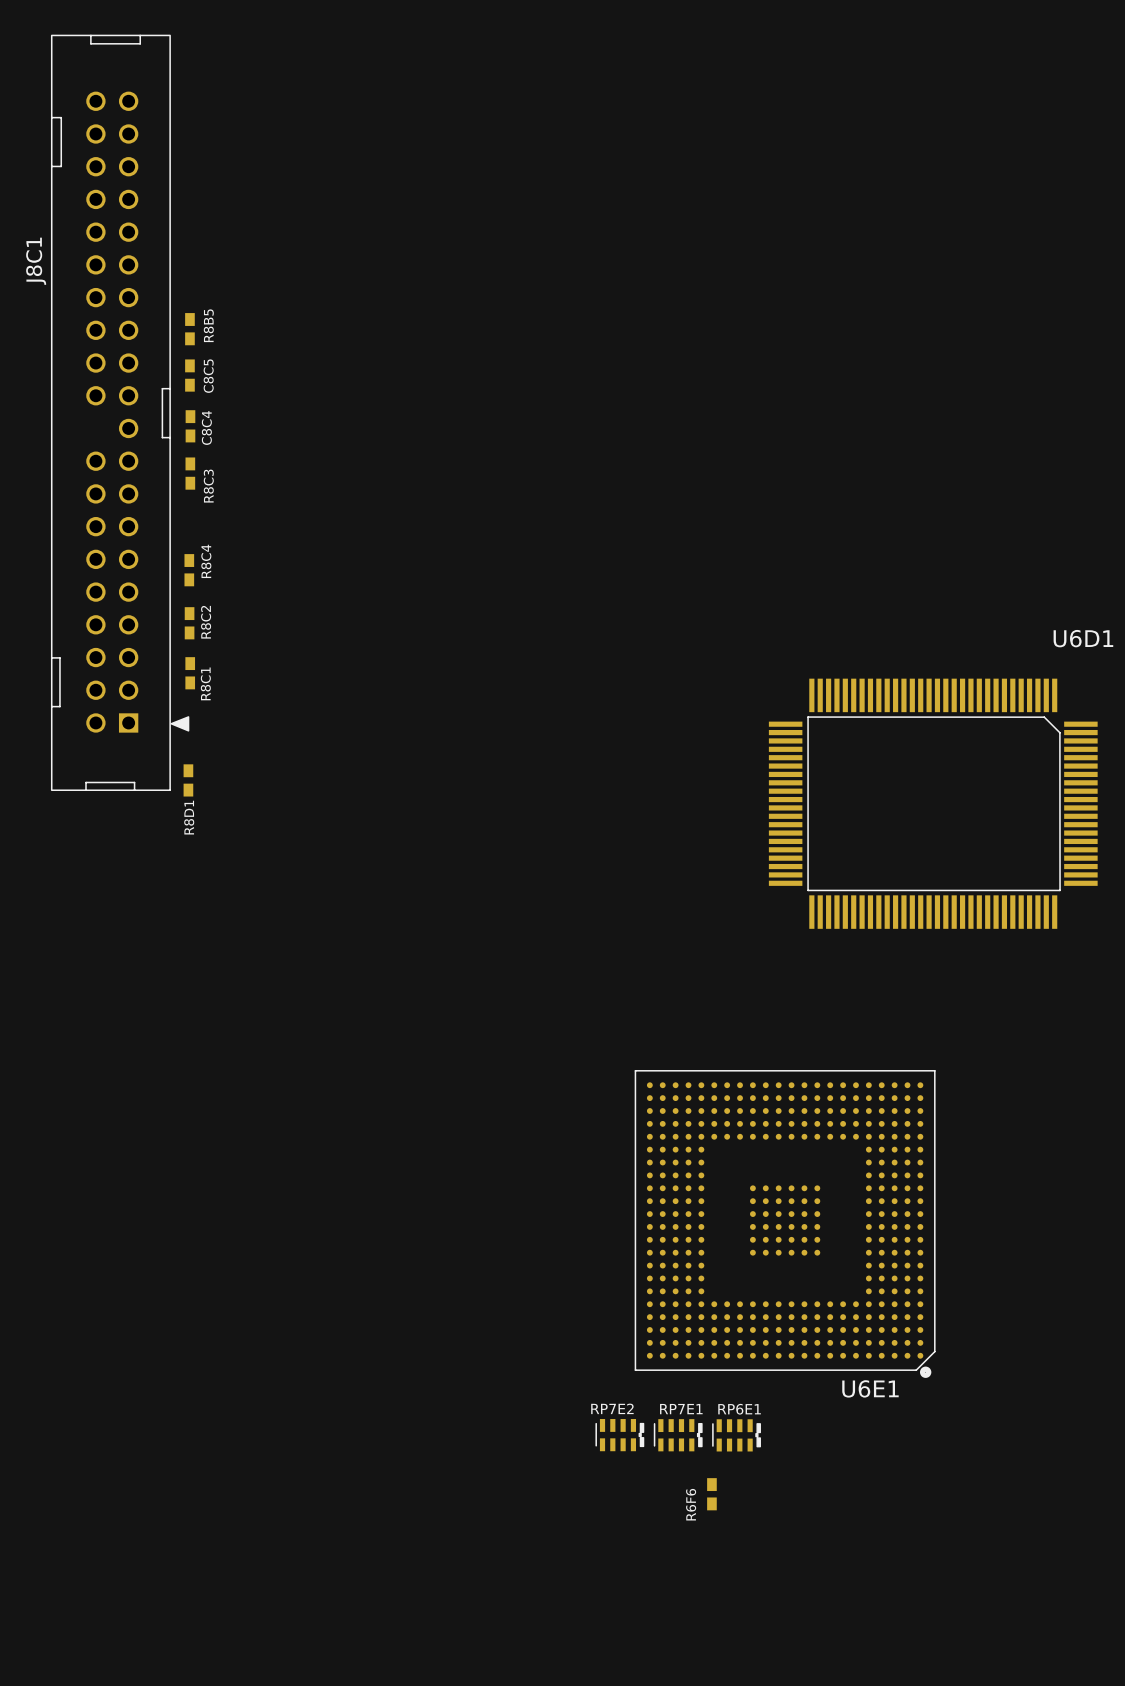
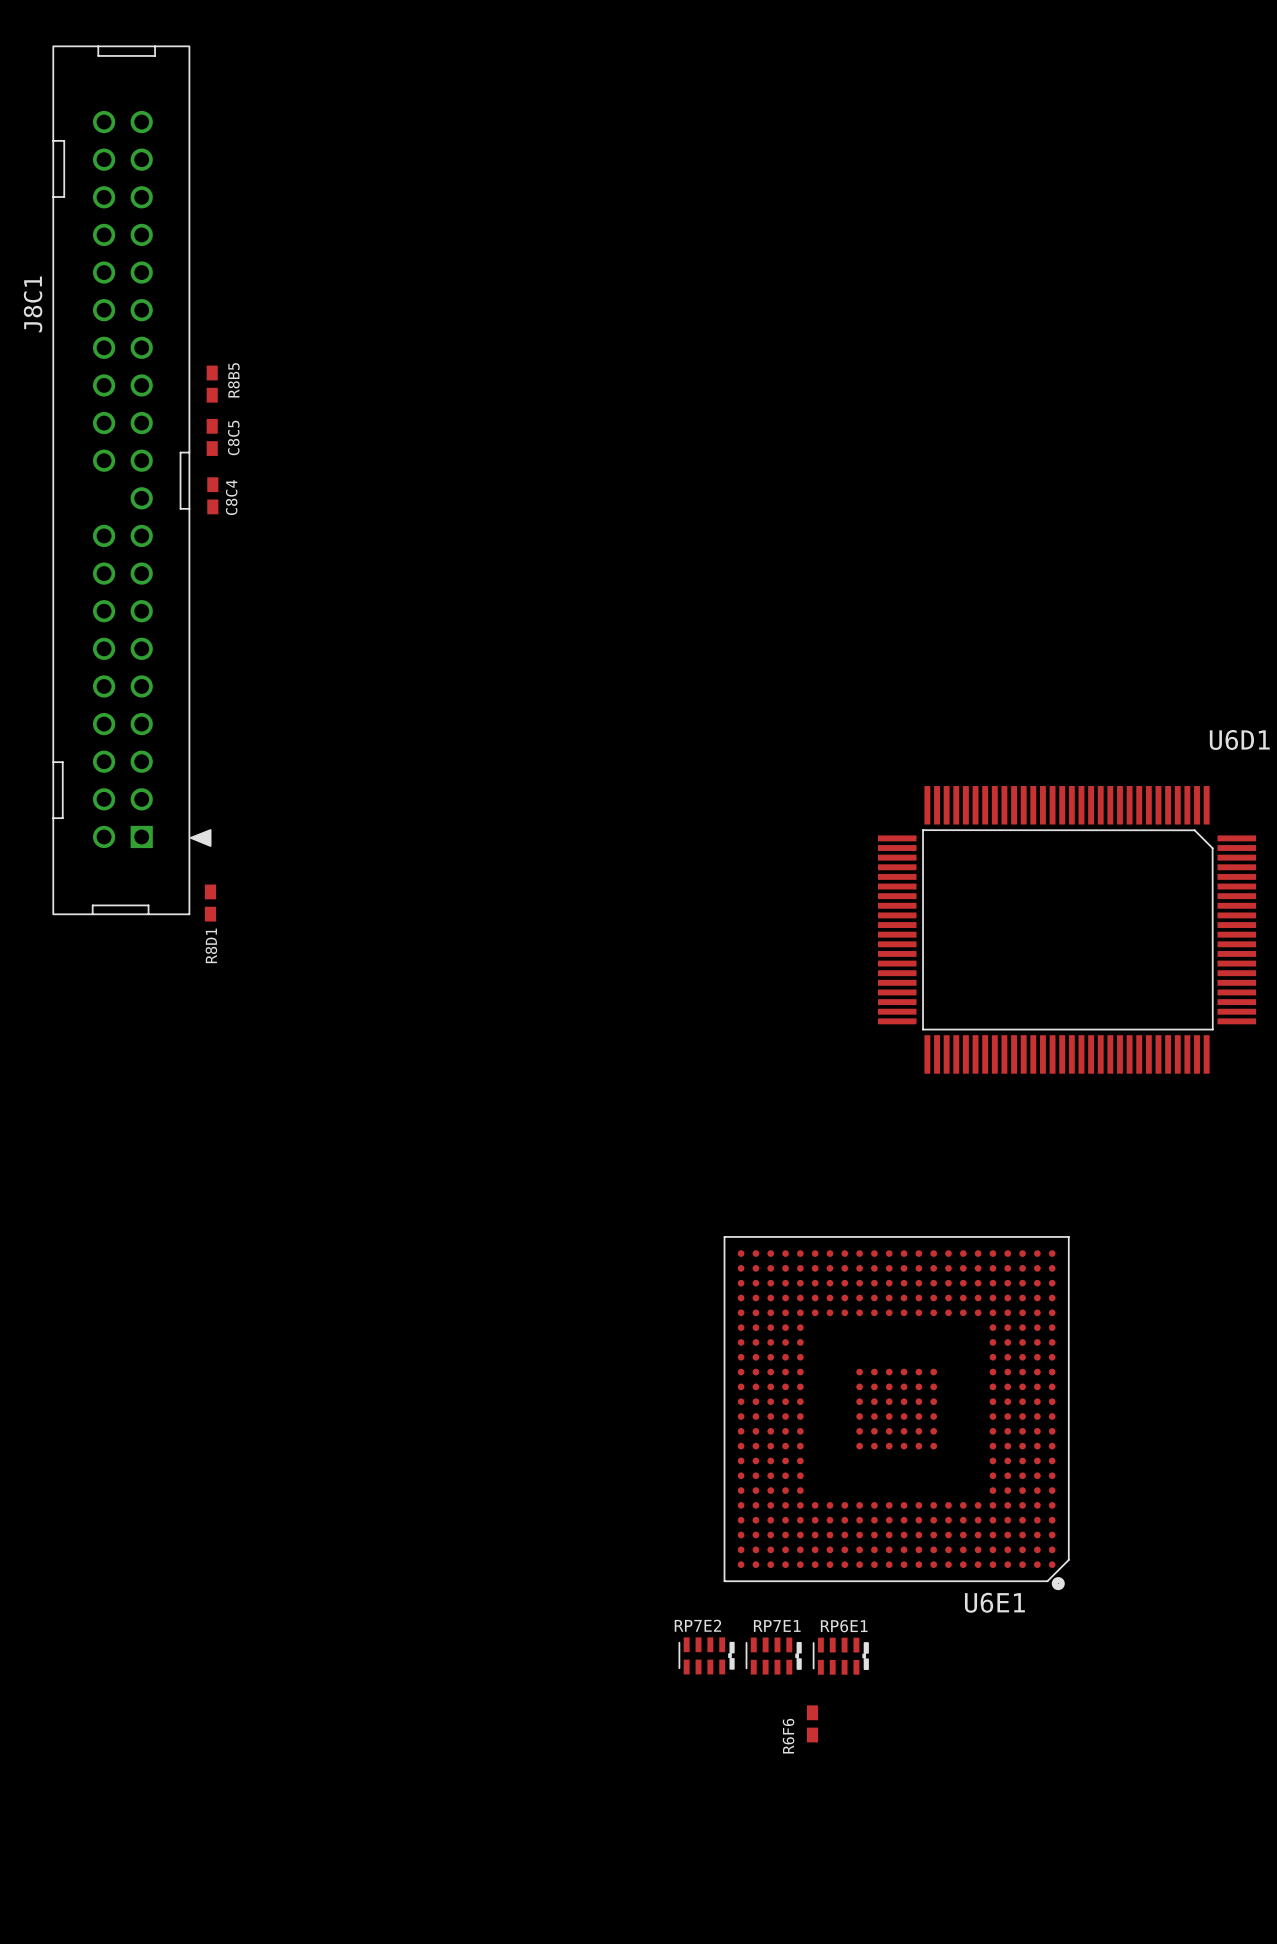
R8C3: (190, 473) -> none
R8C4: (189, 570) -> none
R8C2: (189, 623) -> none
R8C1: (190, 673) -> none

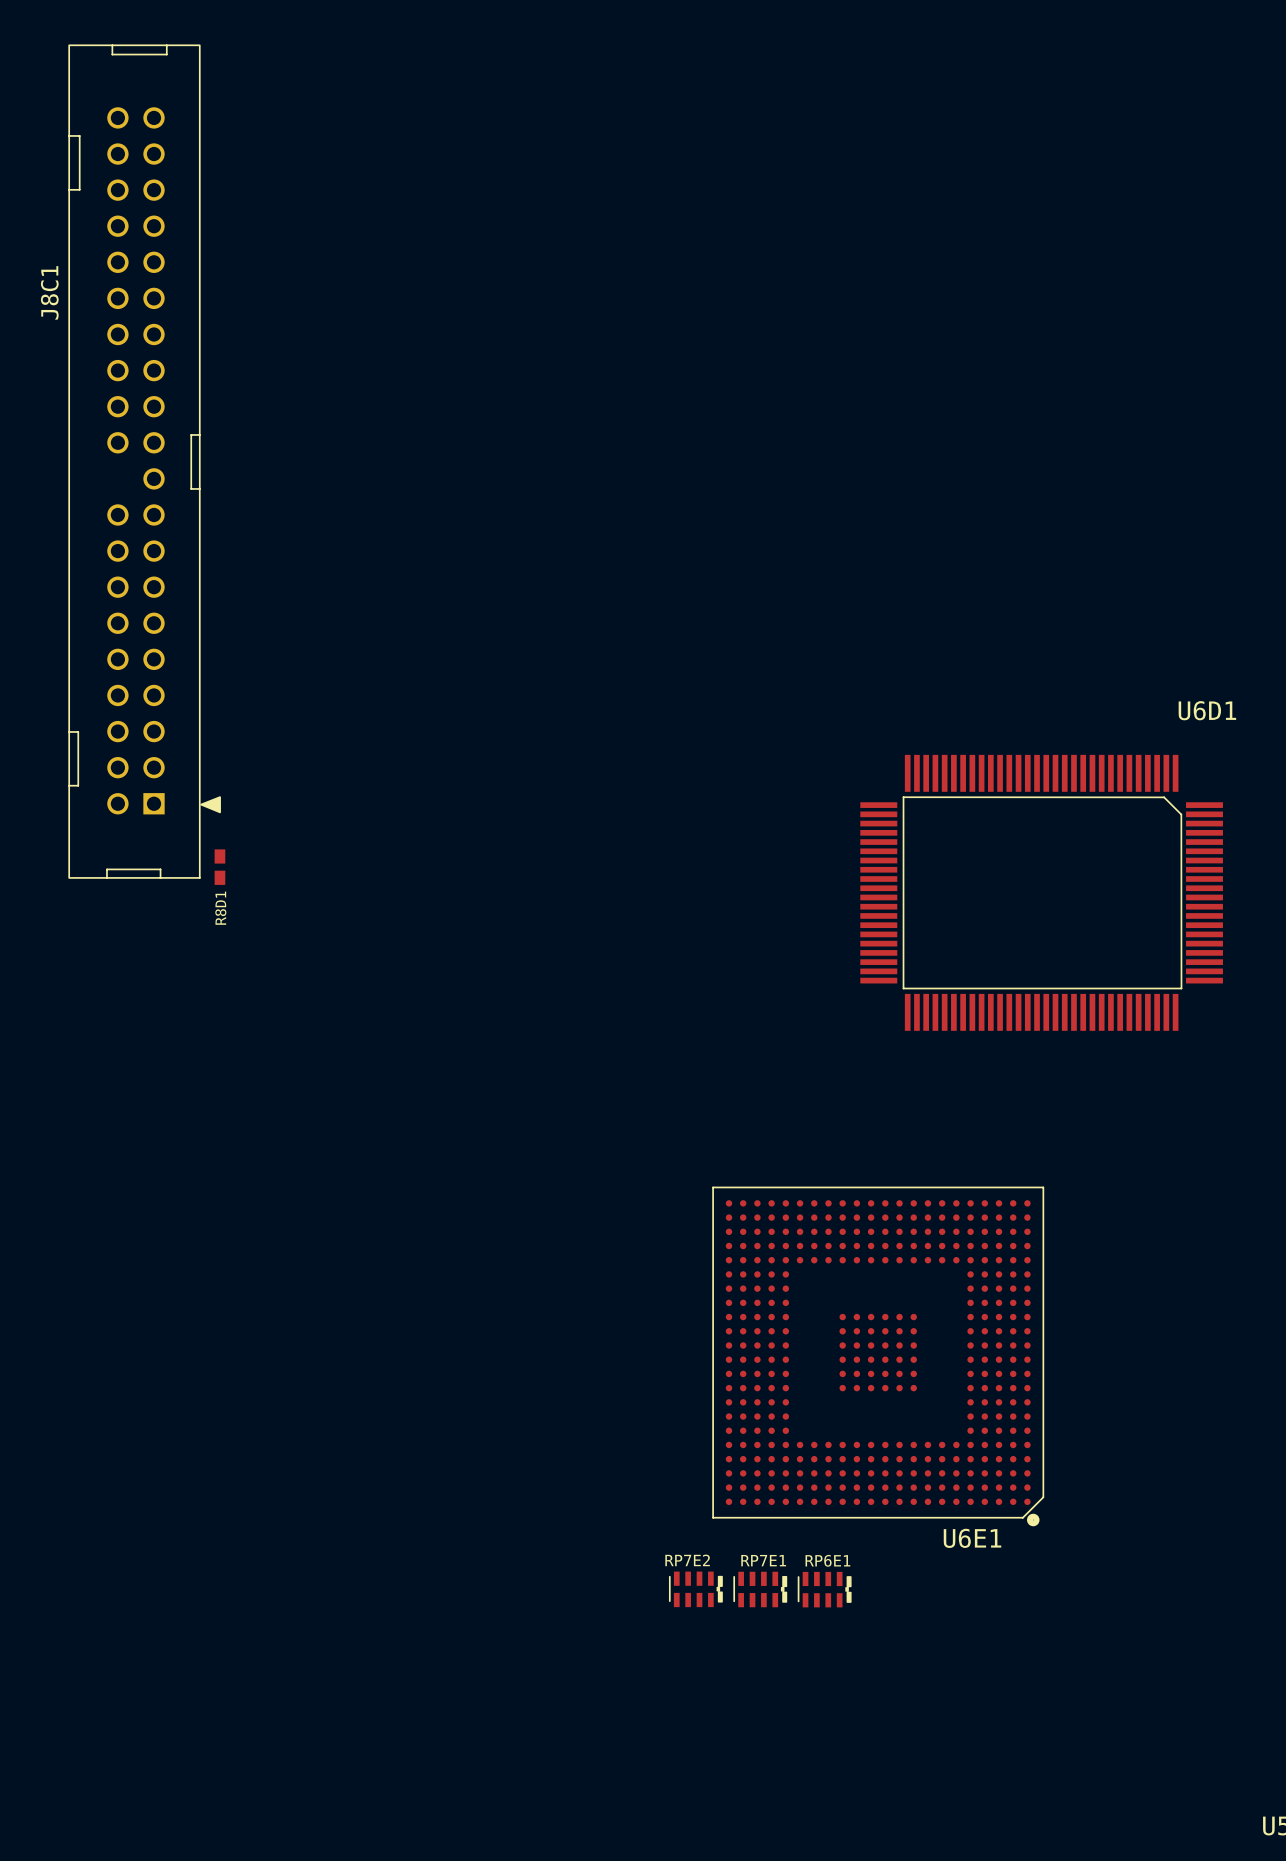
R8B5: (212, 384) -> none
C8C5: (212, 437) -> none
C8C4: (212, 495) -> none
R6F6: (812, 1723) -> none

